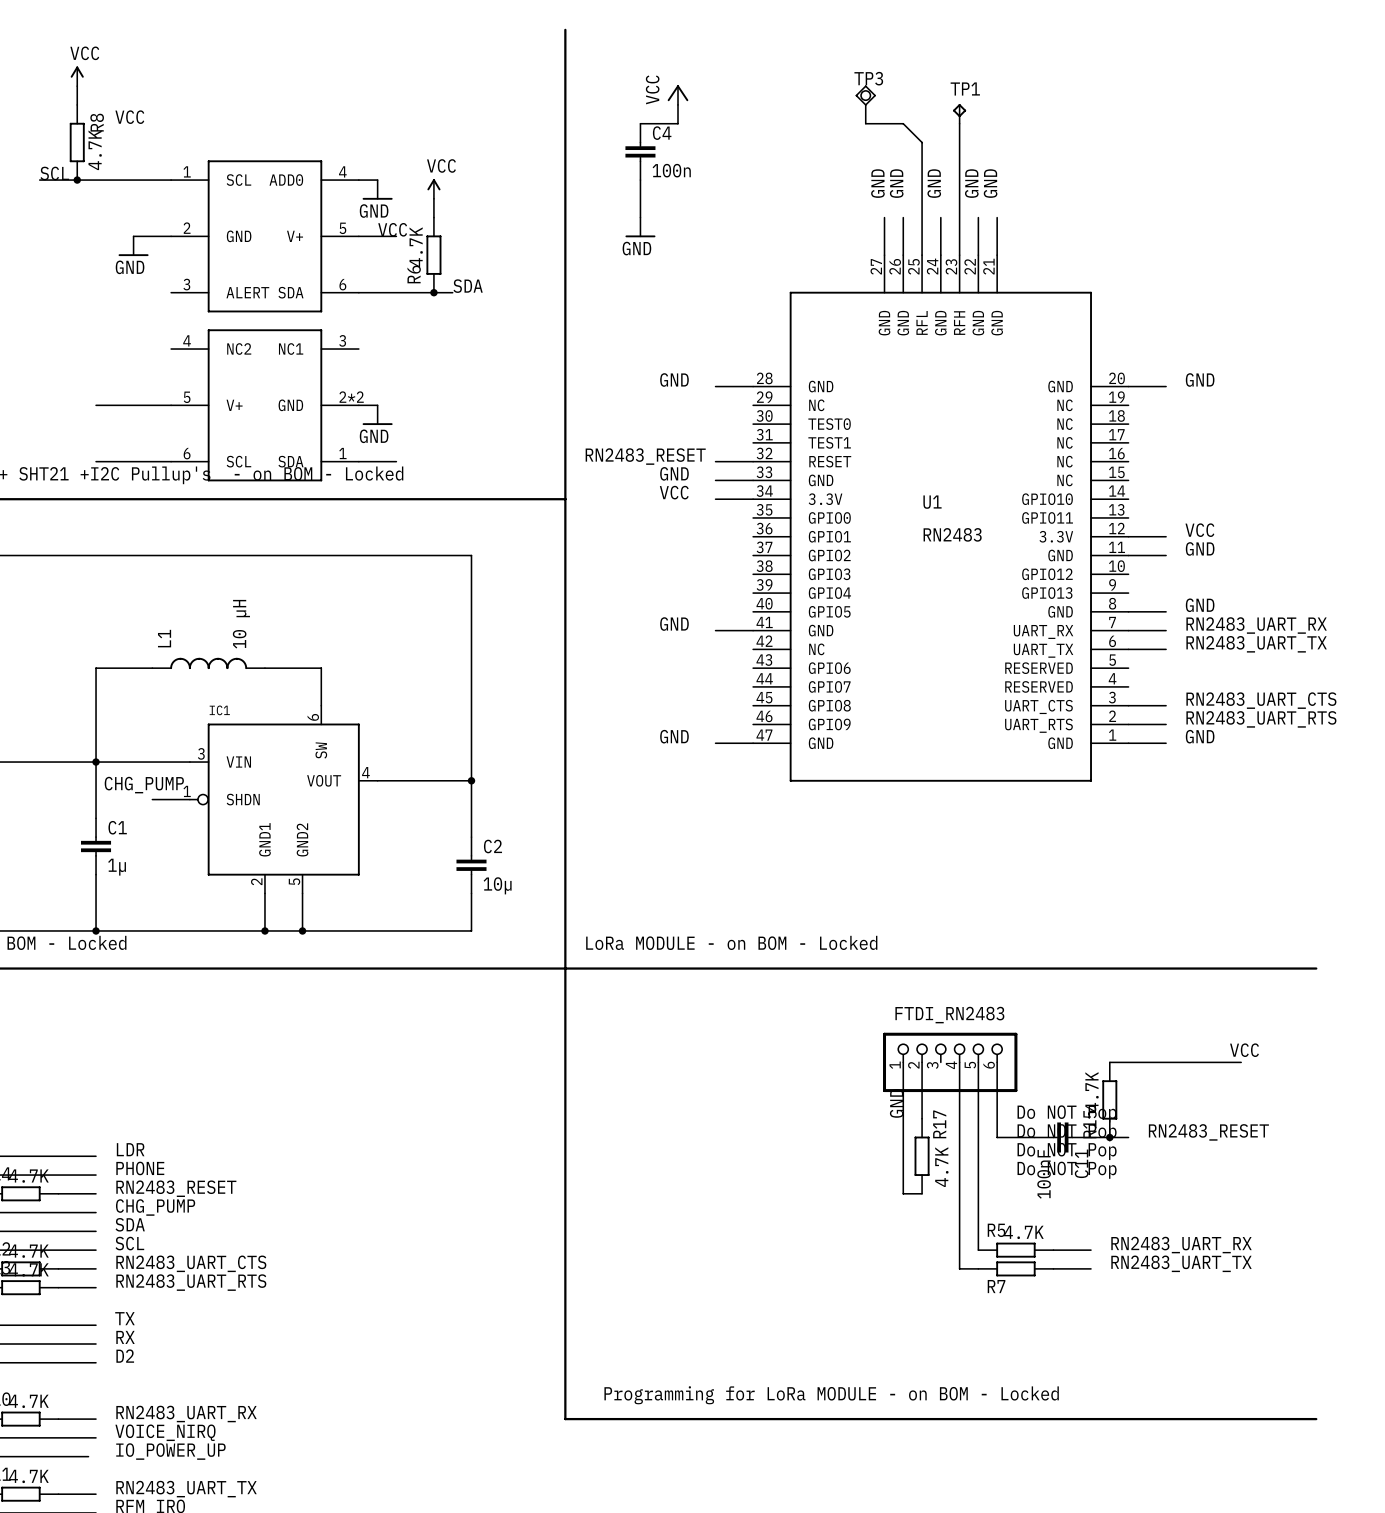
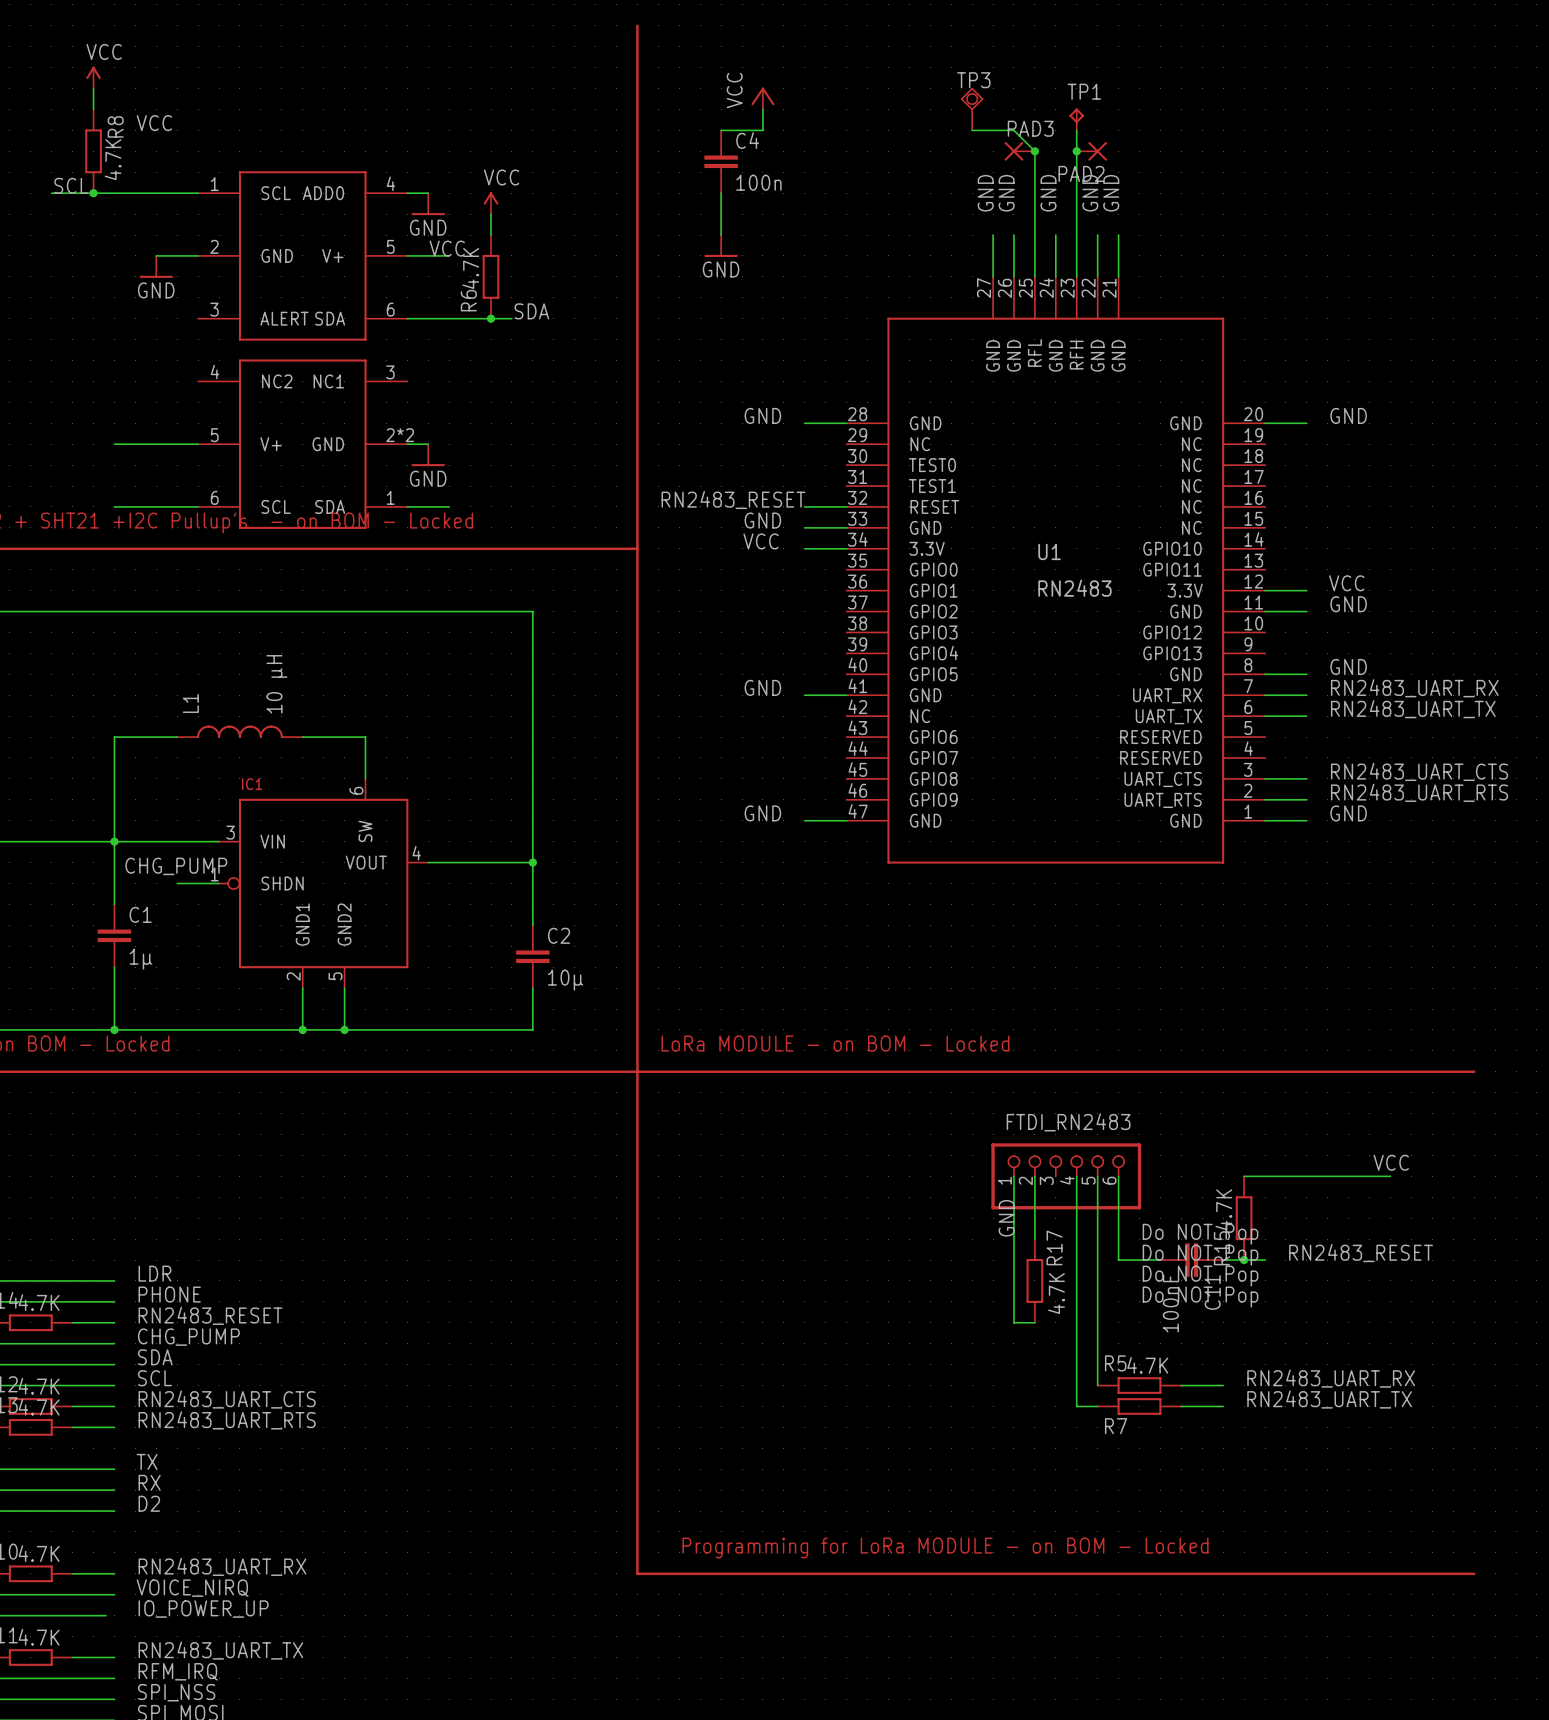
PAD3: none -> (1019, 151)
junction: none -> (1034, 151)
junction: none -> (1076, 151)
PAD2: none -> (1091, 151)

